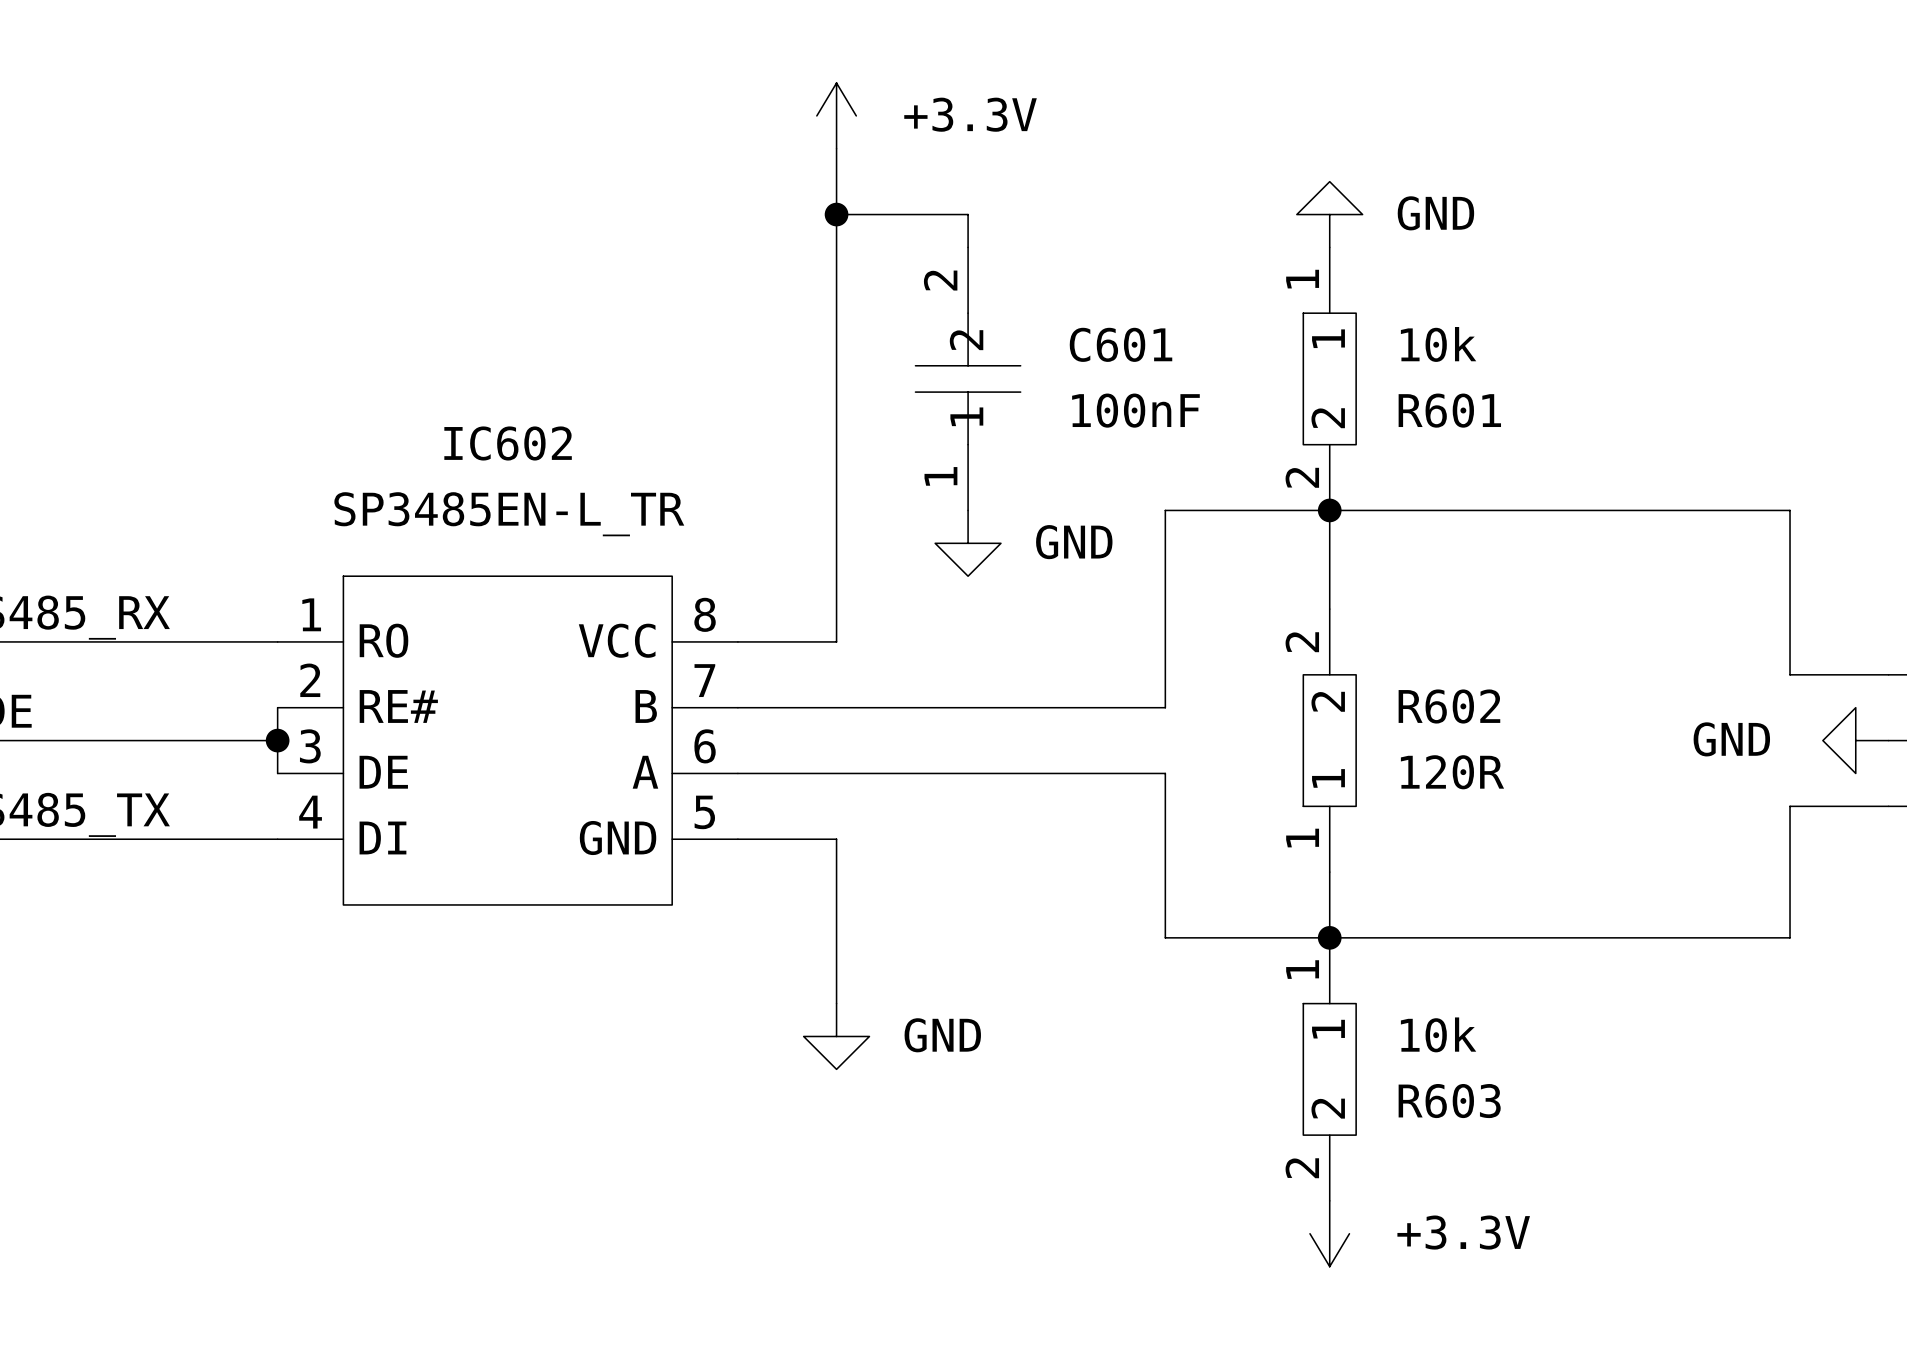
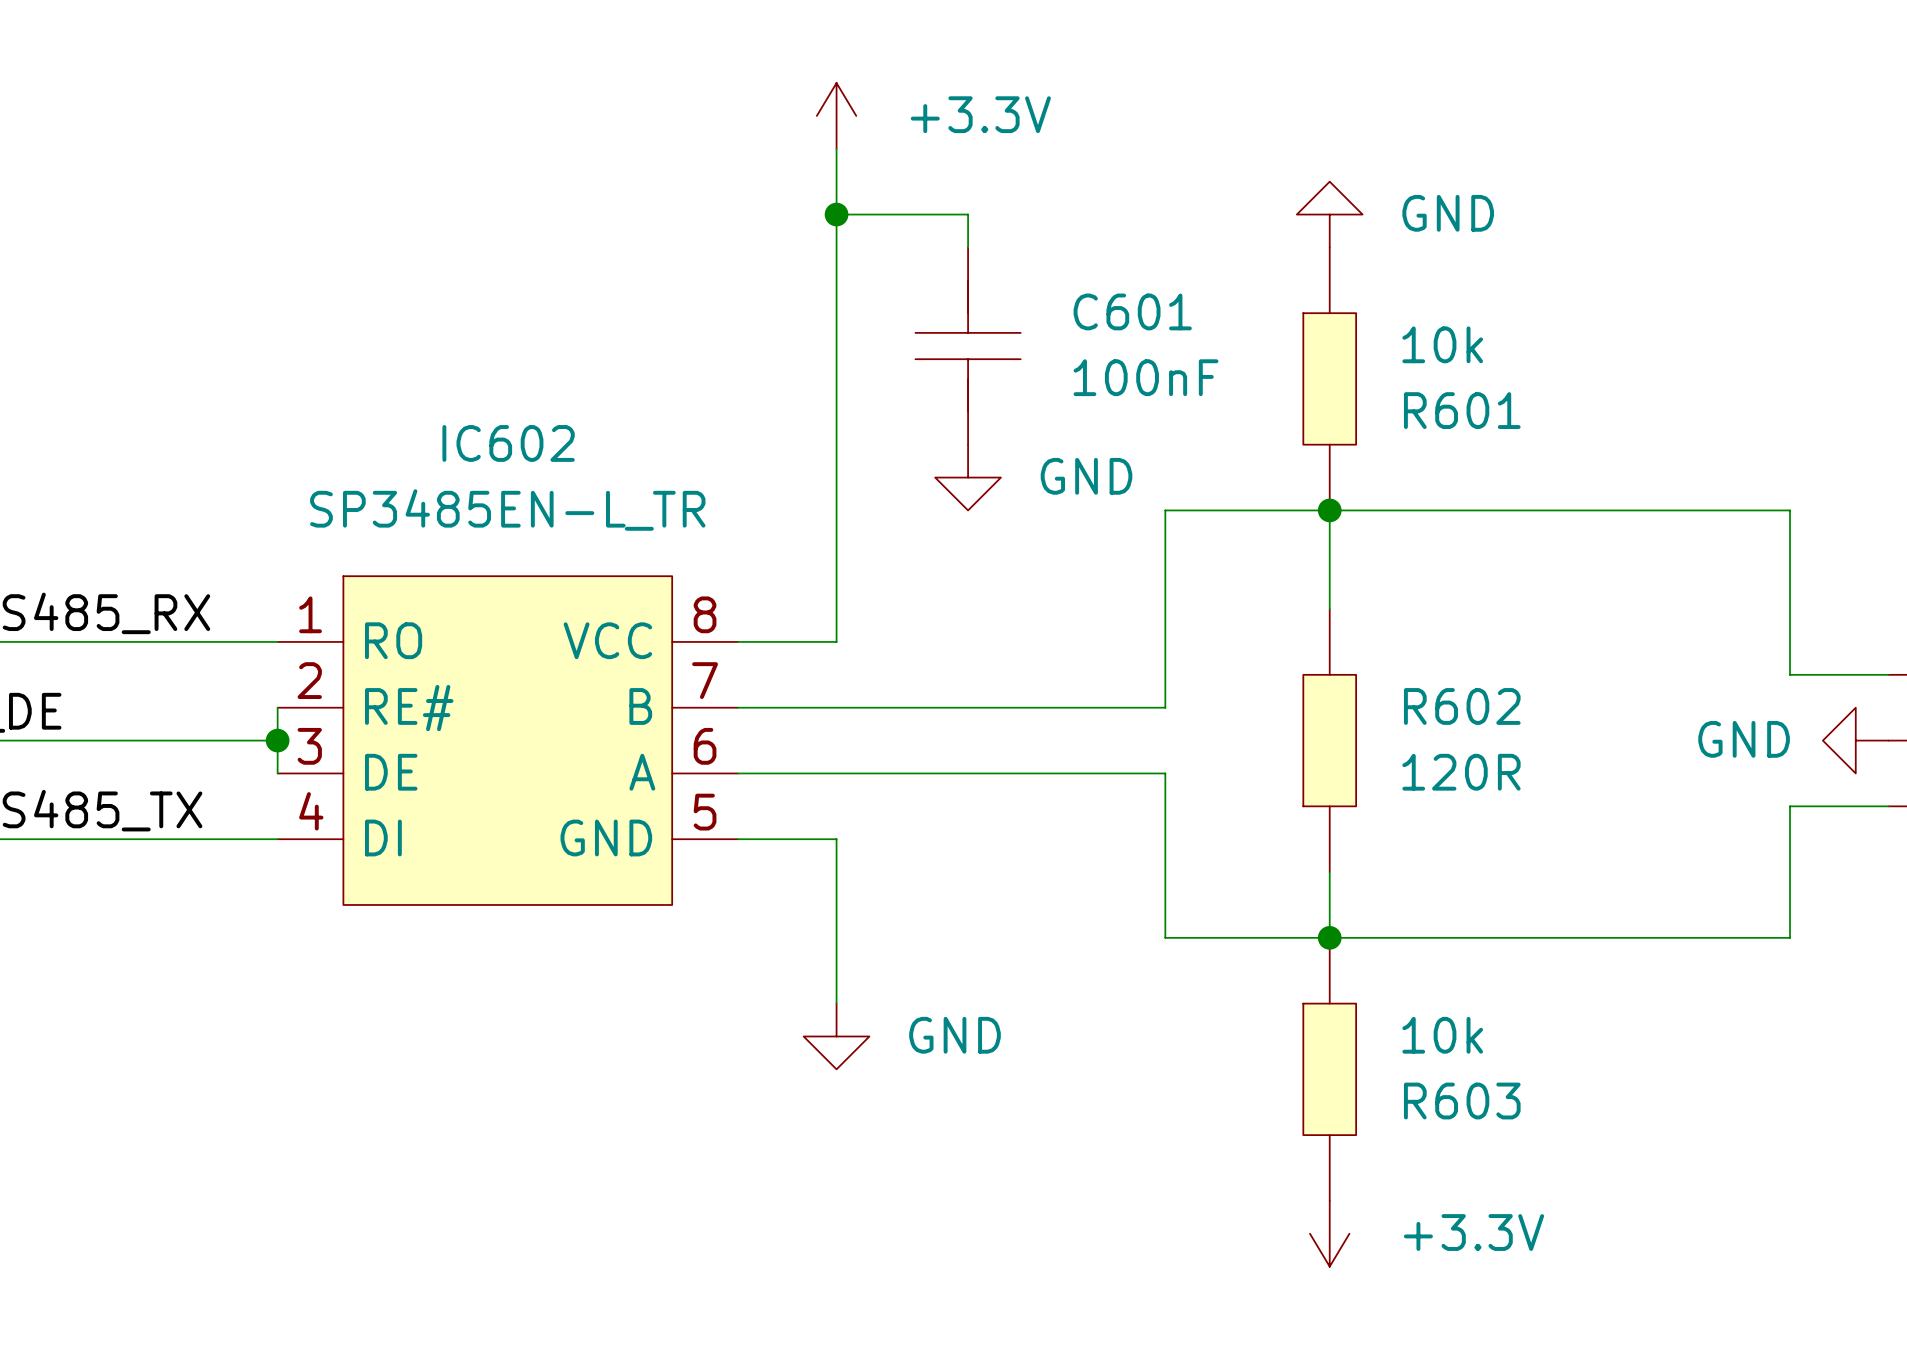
C601 symbol: [915, 247, 1021, 511] -> [915, 247, 1021, 445]
R601 pin number: 1 (1302, 279) -> none
R601 pin name: 1 (1328, 338) -> none
R601 pin name: 2 (1328, 418) -> none
R601 pin number: 2 (1302, 477) -> none
power symbol position: GND (968, 543) -> GND (968, 477)
R602 pin number: 2 (1302, 642) -> none
R602 pin name: 2 (1328, 701) -> none
R602 pin name: 1 (1328, 778) -> none
R602 pin number: 1 (1302, 838) -> none
R603 pin number: 1 (1302, 969) -> none
R603 pin name: 1 (1328, 1029) -> none
R603 pin name: 2 (1328, 1108) -> none
R603 pin number: 2 (1302, 1168) -> none

